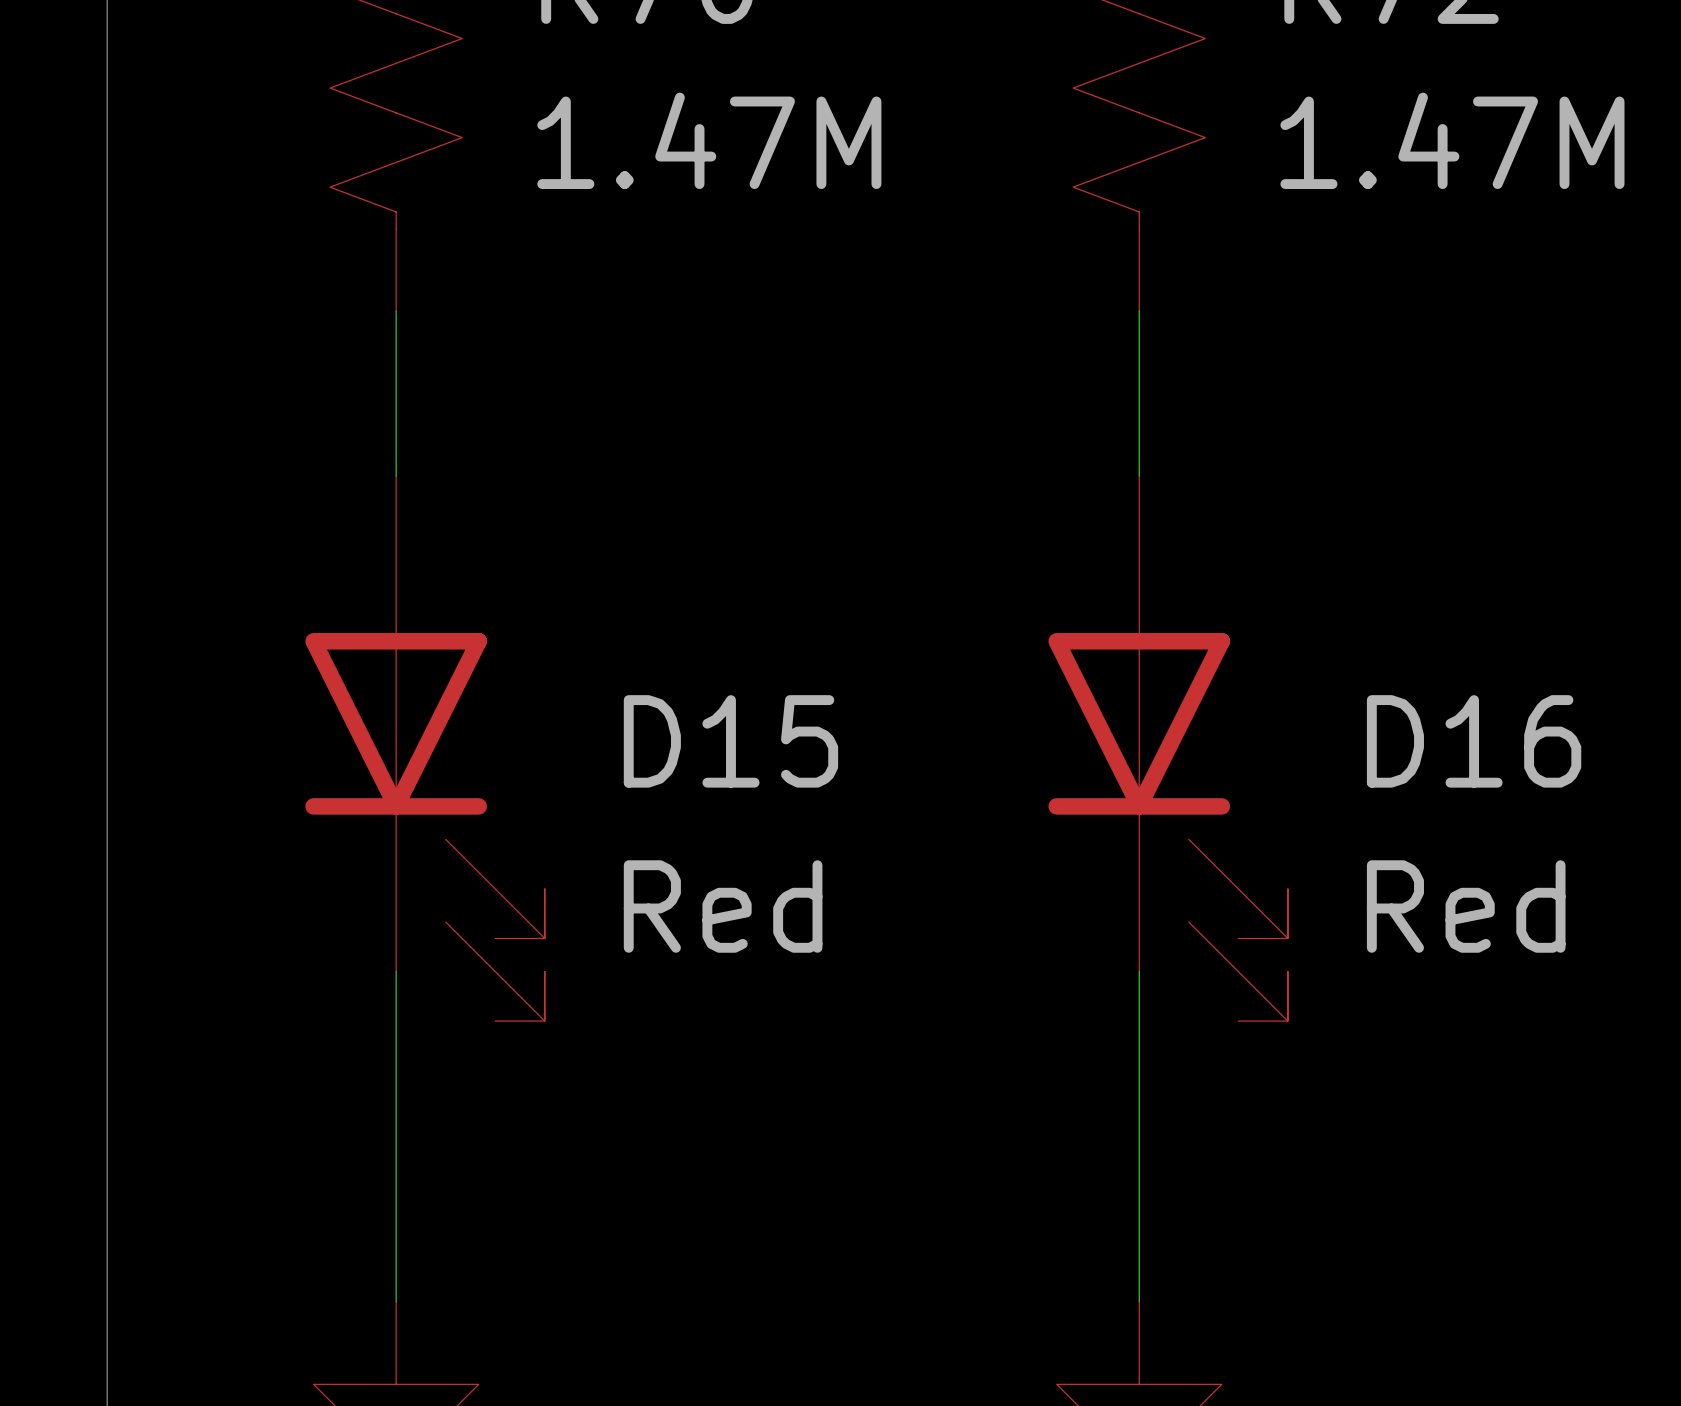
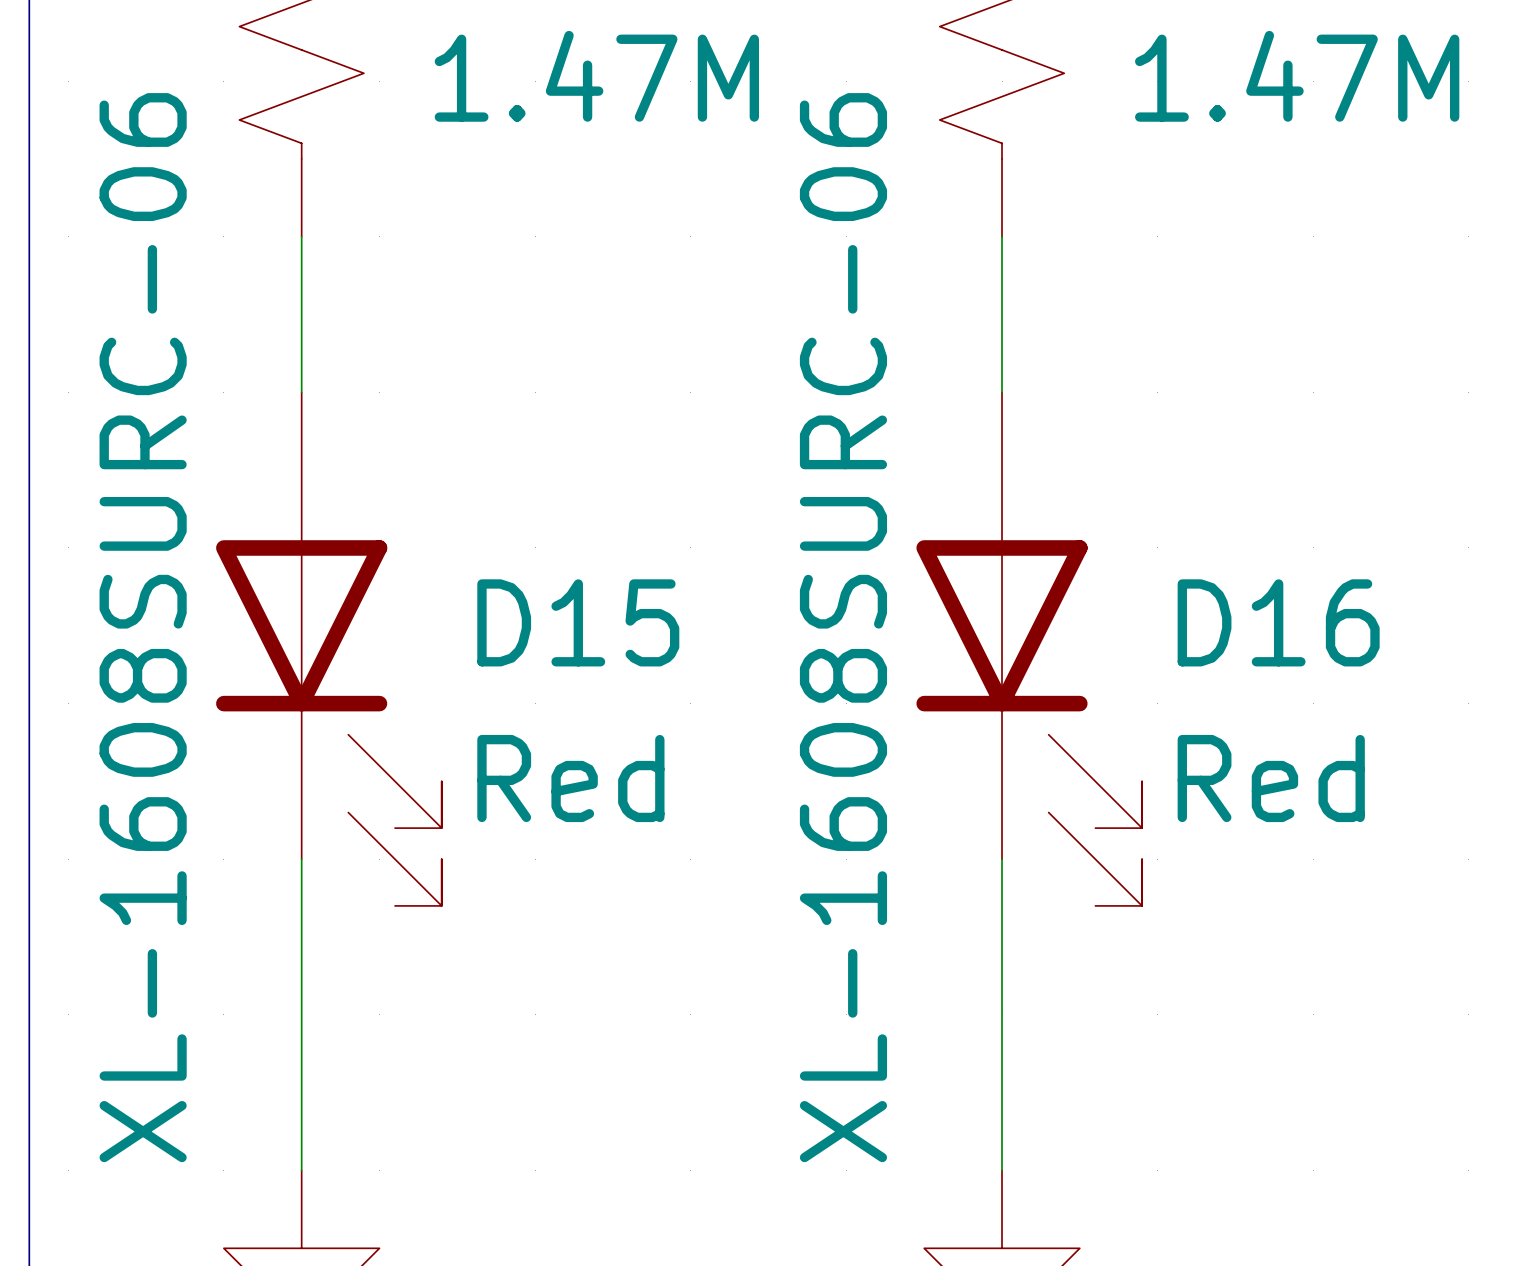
D15 name position: D15 (730, 741) -> D15 (578, 622)
D16 name position: D16 (1474, 741) -> D16 (1278, 622)
D15 text: none -> Red (570, 778)
D16 text: none -> Red (1271, 778)
D15 value: Red (723, 906) -> XL-1608SURC-06 (143, 627)
D16 value: Red (1466, 906) -> XL-1608SURC-06 (843, 627)

